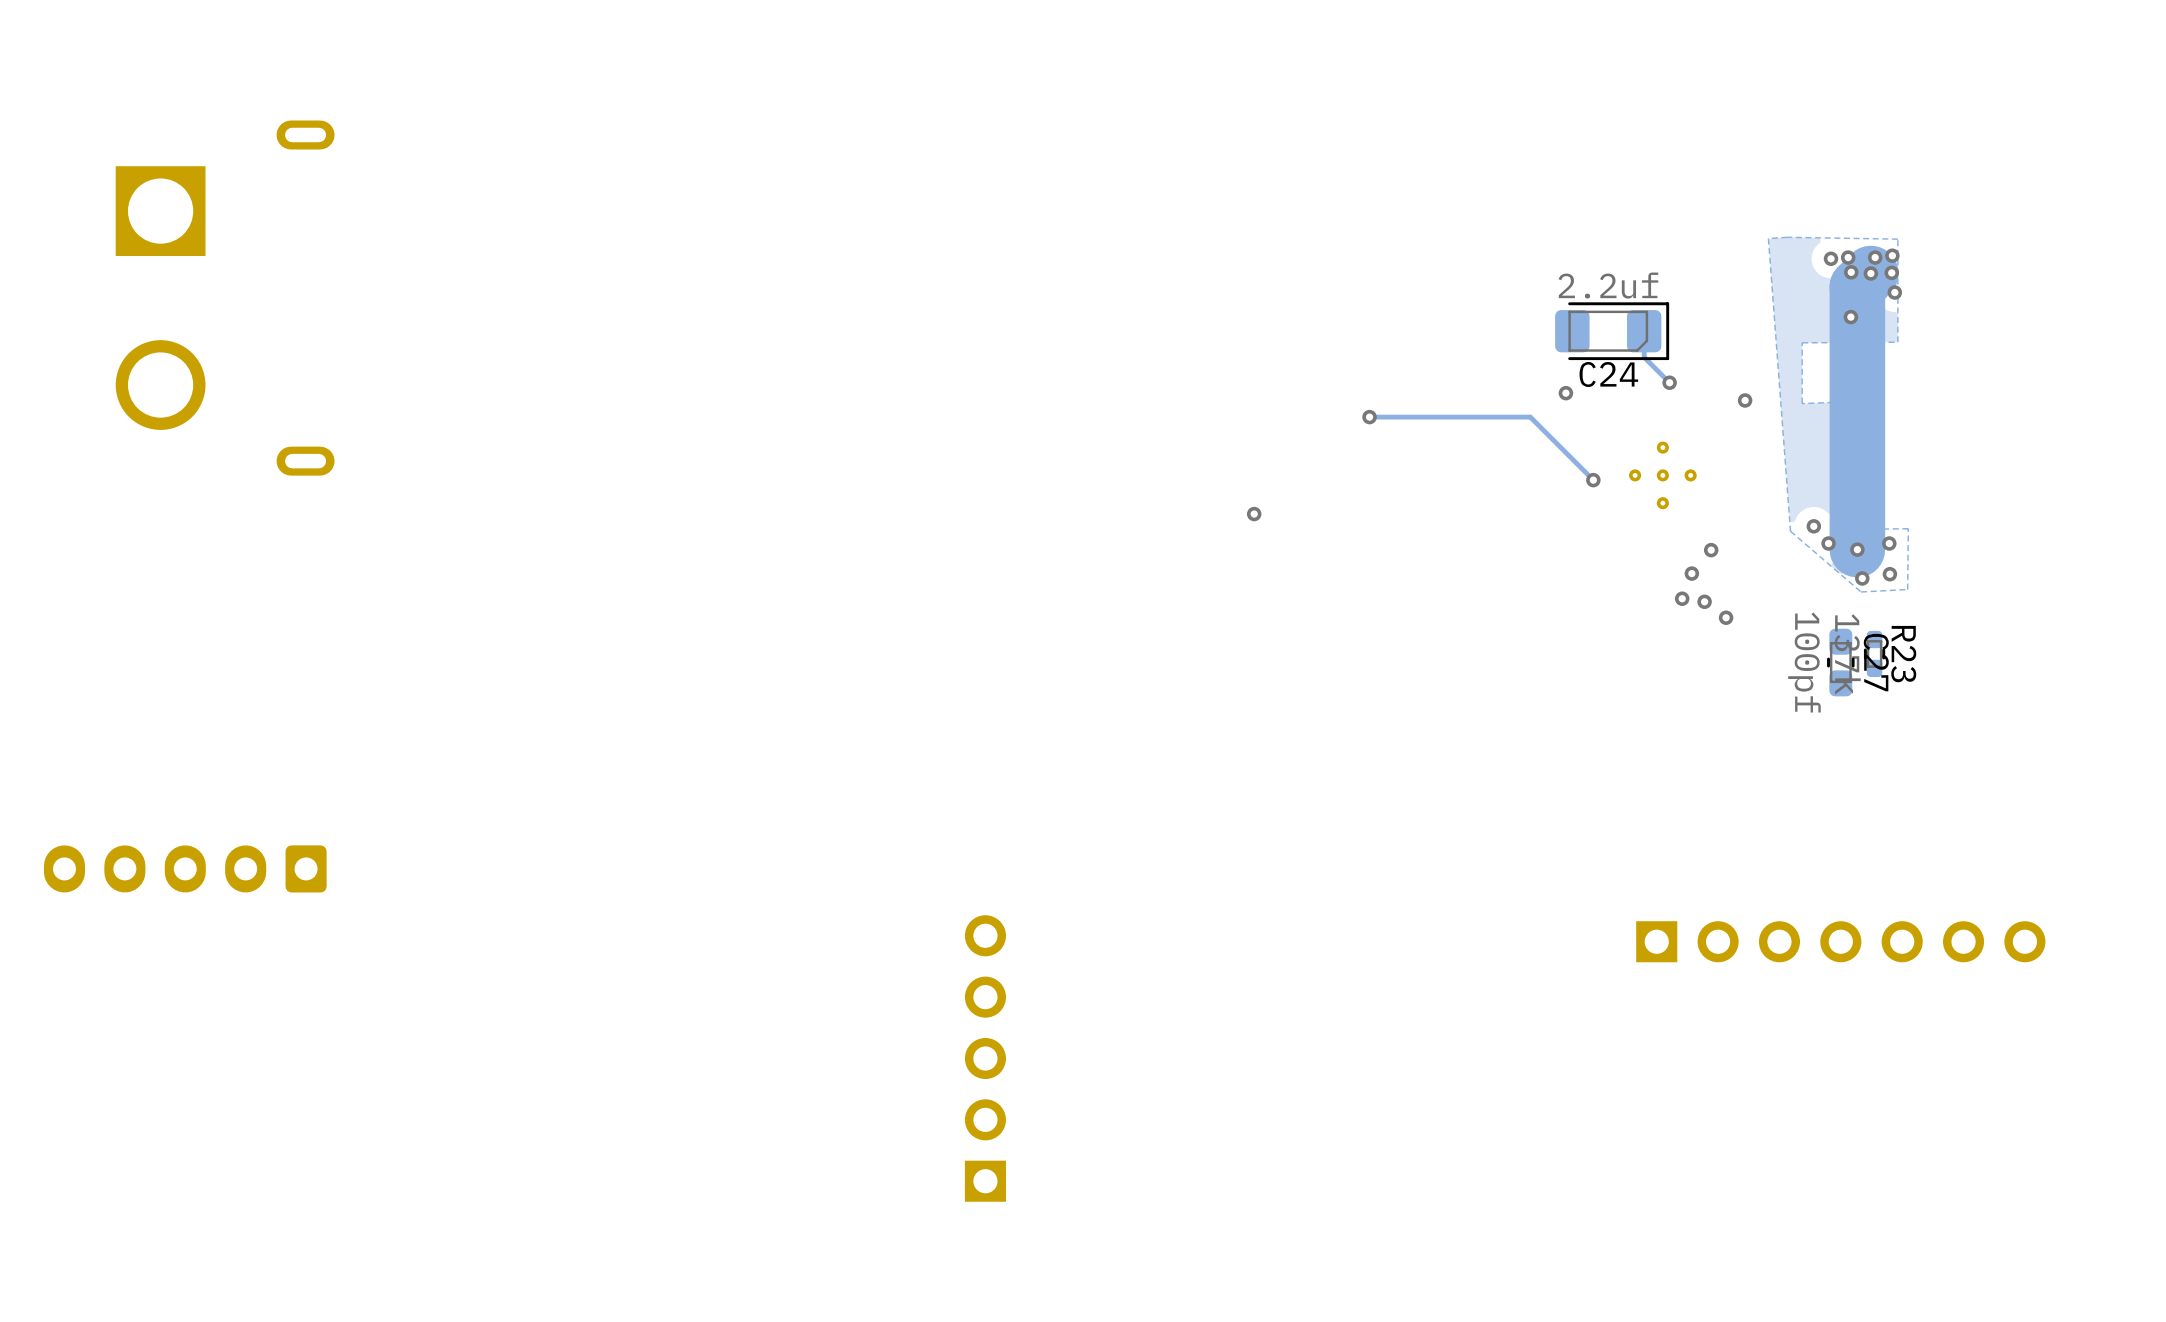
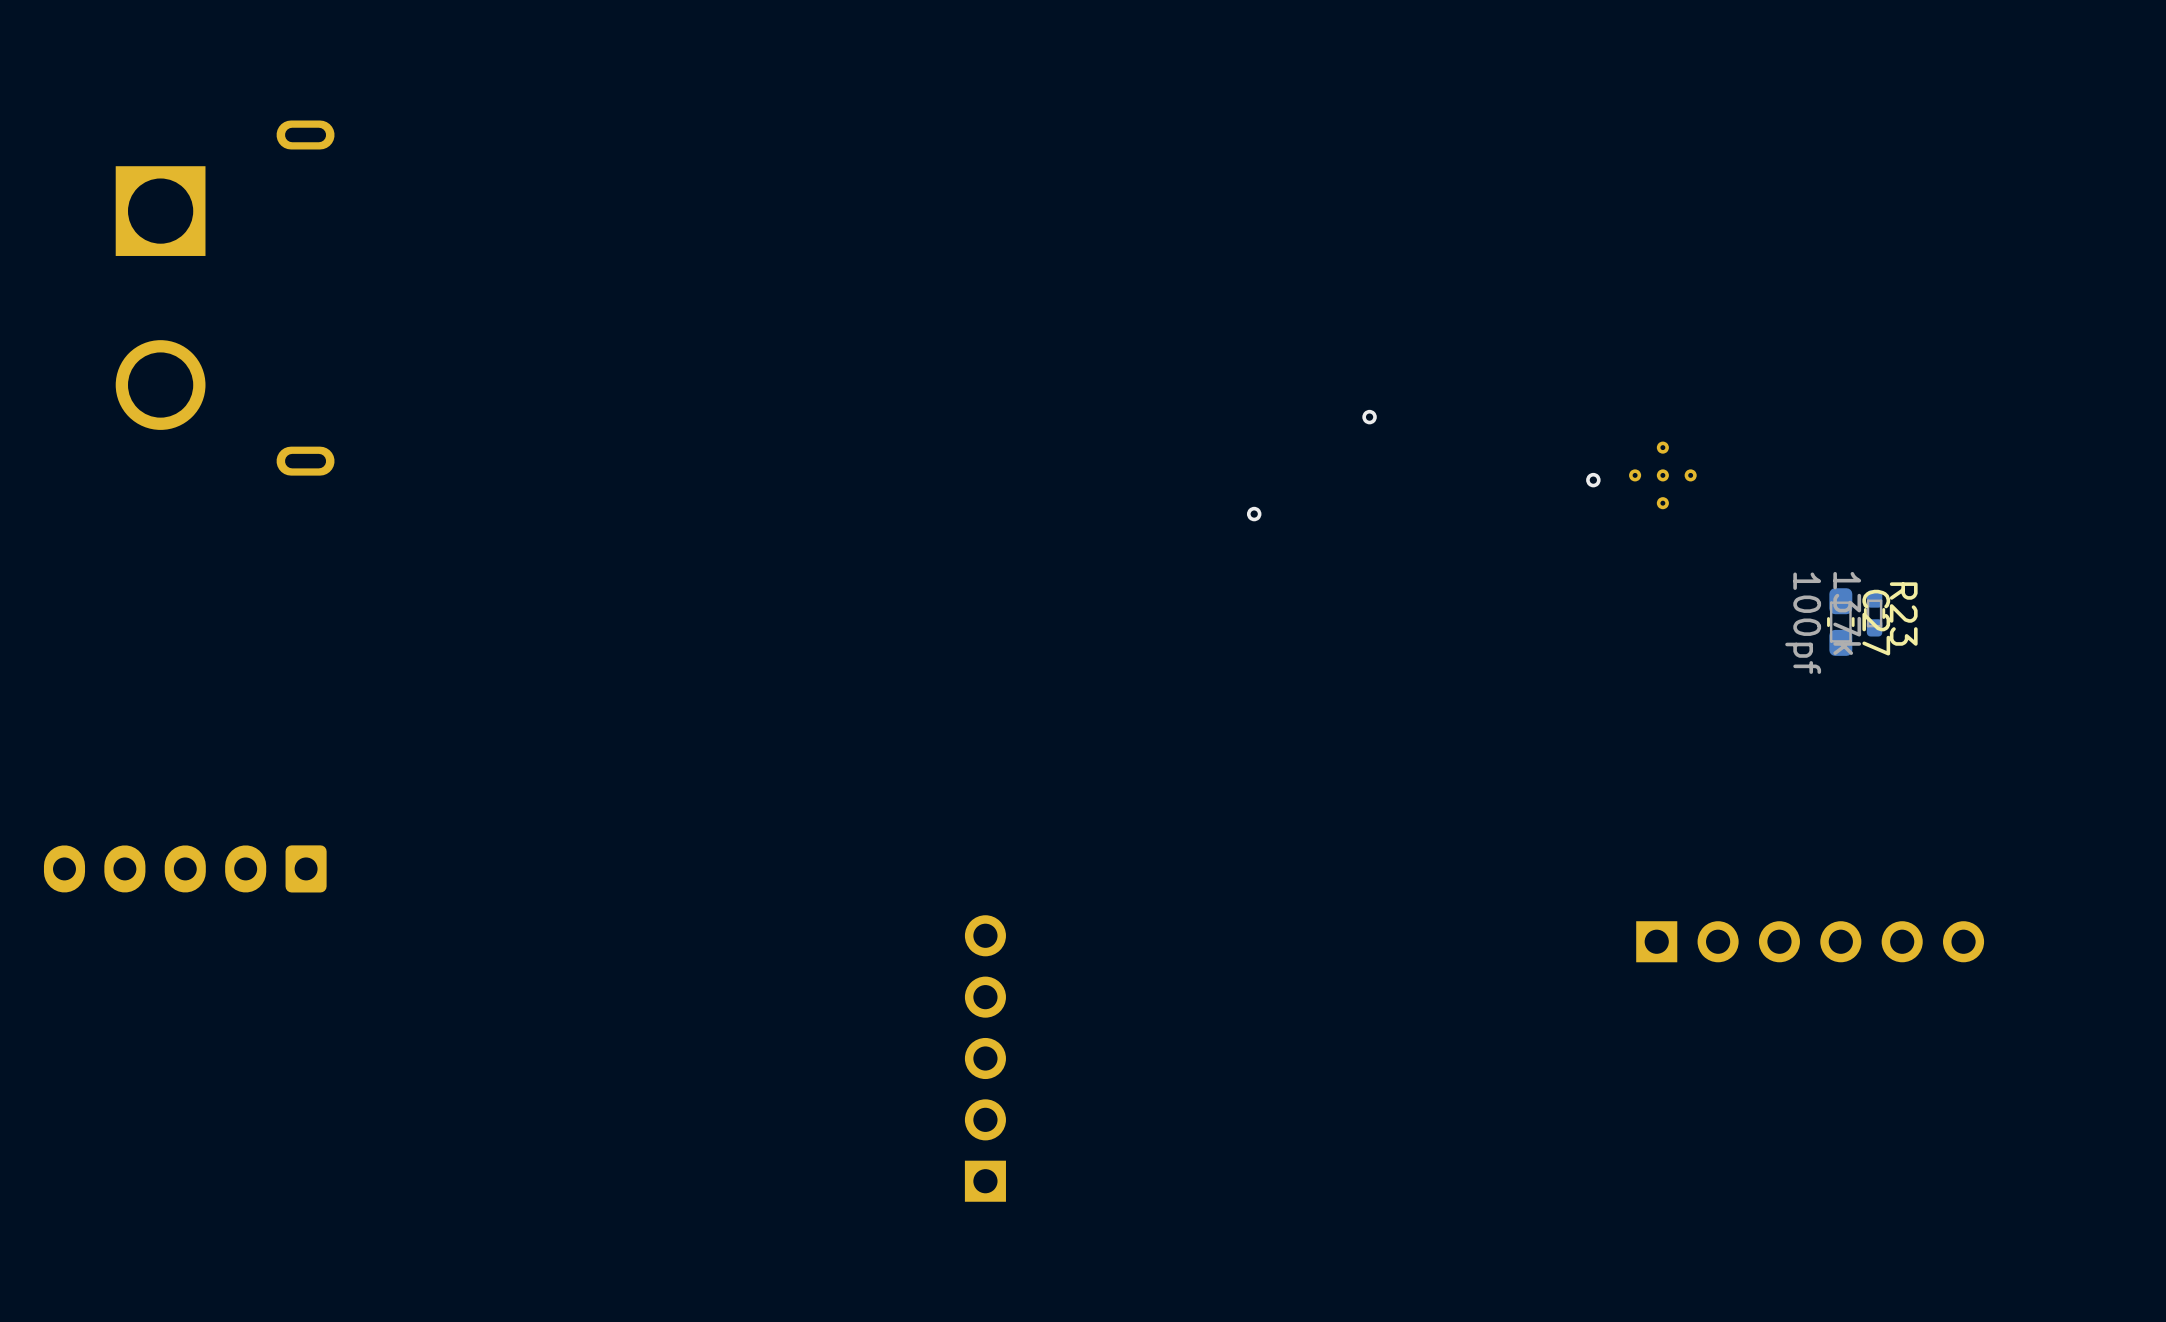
zone outline: (1787, 237) (1897, 239) (1897, 342) (1802, 342) (1802, 403) (1833, 402) (1832, 529) (1908, 528) (1907, 589) (1861, 591) (1790, 531) (1768, 238) (1787, 237) -> none
via: (1892, 255) -> none
via: (1848, 257) -> none
via: (1875, 257) -> none
via: (1831, 258) -> none
via: (1851, 272) -> none
via: (1891, 272) -> none
track: (1870, 273) (1857, 287) (1857, 549) -> none
via: (1870, 273) -> none
via: (1894, 292) -> none
via: (1850, 317) -> none
C24: 2.2uf (1612, 331) -> none
track: (1644, 331) (1644, 357) (1669, 382) -> none
via: (1669, 382) -> none
via: (1565, 393) -> none
via: (1745, 400) -> none
track: (1369, 417) (1530, 417) (1593, 480) -> none
via: (1813, 526) -> none
via: (1828, 543) -> none
via: (1889, 543) -> none
via: (1857, 549) -> none
via: (1711, 550) -> none
via: (1691, 573) -> none
via: (1889, 574) -> none
via: (1862, 578) -> none
via: (1682, 598) -> none
via: (1704, 601) -> none
via: (1726, 617) -> none
R23 position: (1874, 653) -> (1874, 613)
C27 position: (1840, 662) -> (1840, 622)
part: (1840, 941) -> none

